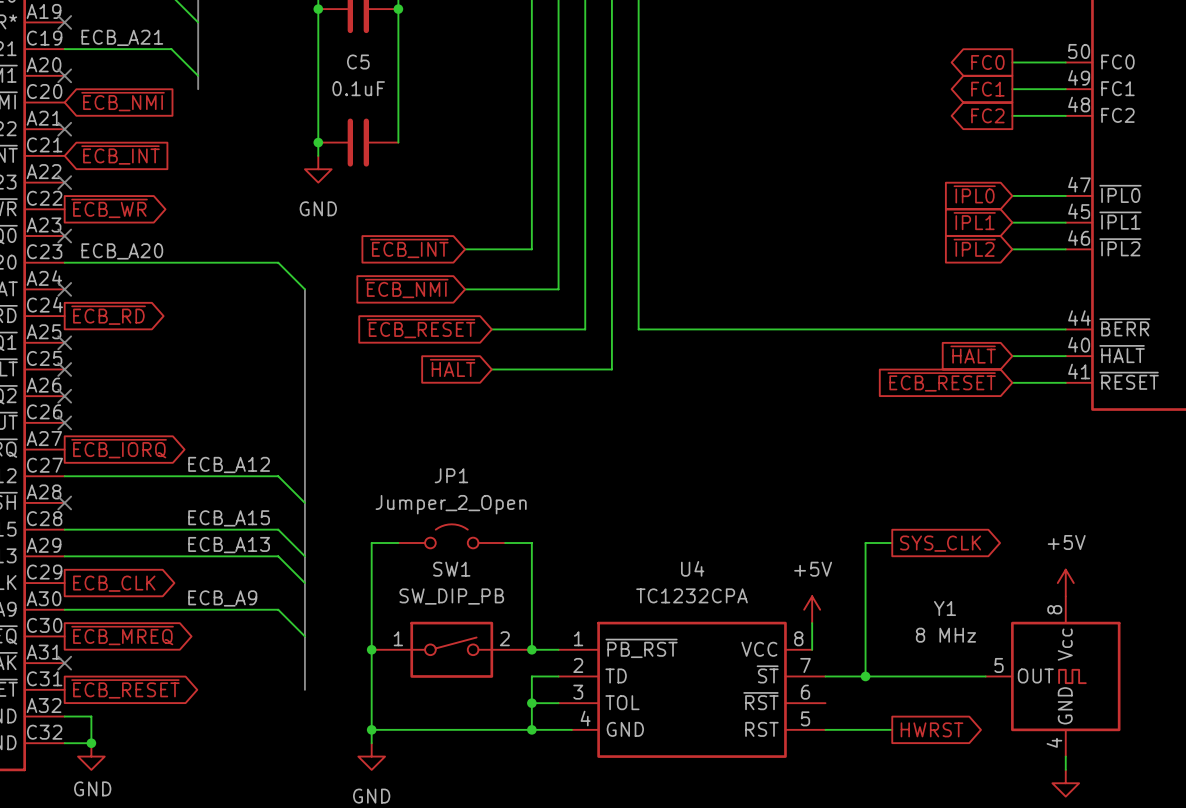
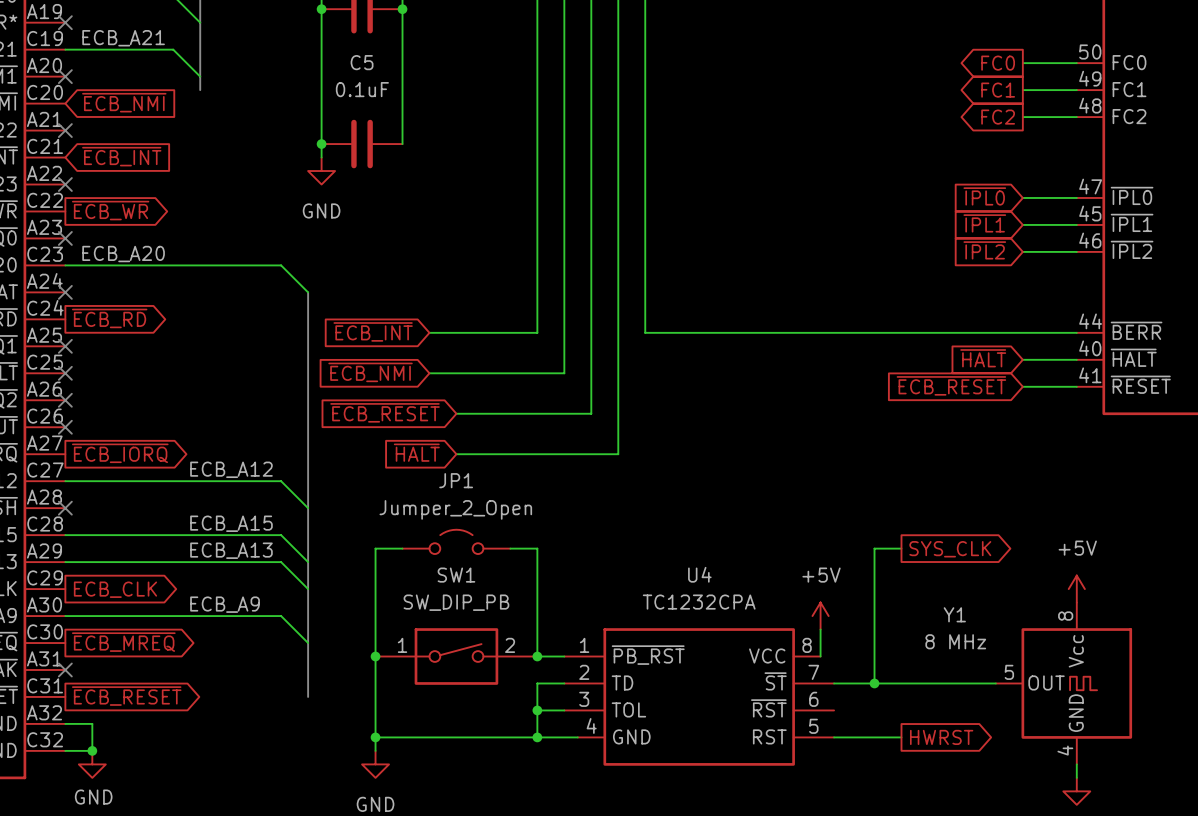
global label position: ~{ECB_INT} (409, 248) -> ~{ECB_INT} (373, 331)
wire: (465, 249) (531, 249) -> (429, 332) (496, 332)
global label position: ~{ECB_NMI} (406, 288) -> ~{ECB_NMI} (370, 372)
wire: (465, 289) (558, 289) -> none
global label position: ~{ECB_RESET} (421, 328) -> ~{ECB_RESET} (385, 412)
wire: (531, 329) (585, 329) -> (537, 332) (537, 251)
wire: none -> (591, 332) (591, 413) (456, 413)
global label position: ~{HALT} (452, 367) -> ~{HALT} (416, 452)
wire: none -> (429, 373) (496, 373)
wire: (558, 369) (611, 369) -> (564, 373) (564, 292)
wire: none -> (618, 373) (618, 454) (456, 454)

